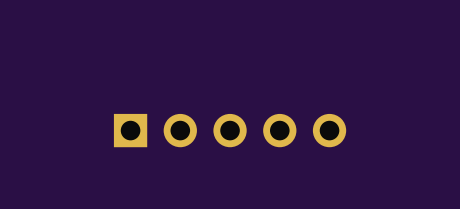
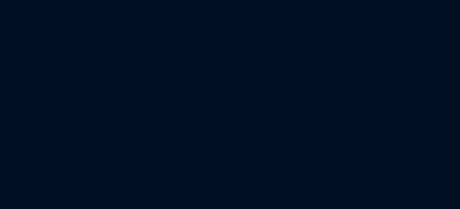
part: (230, 130) -> none

